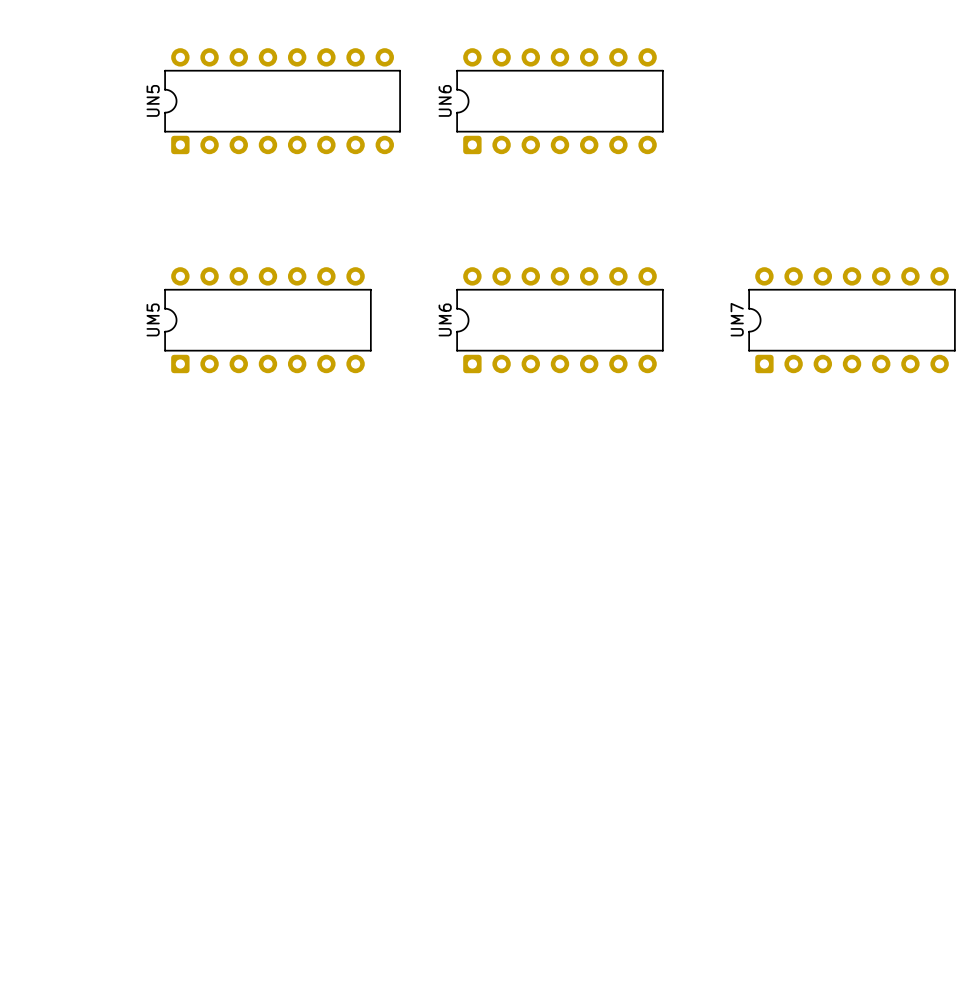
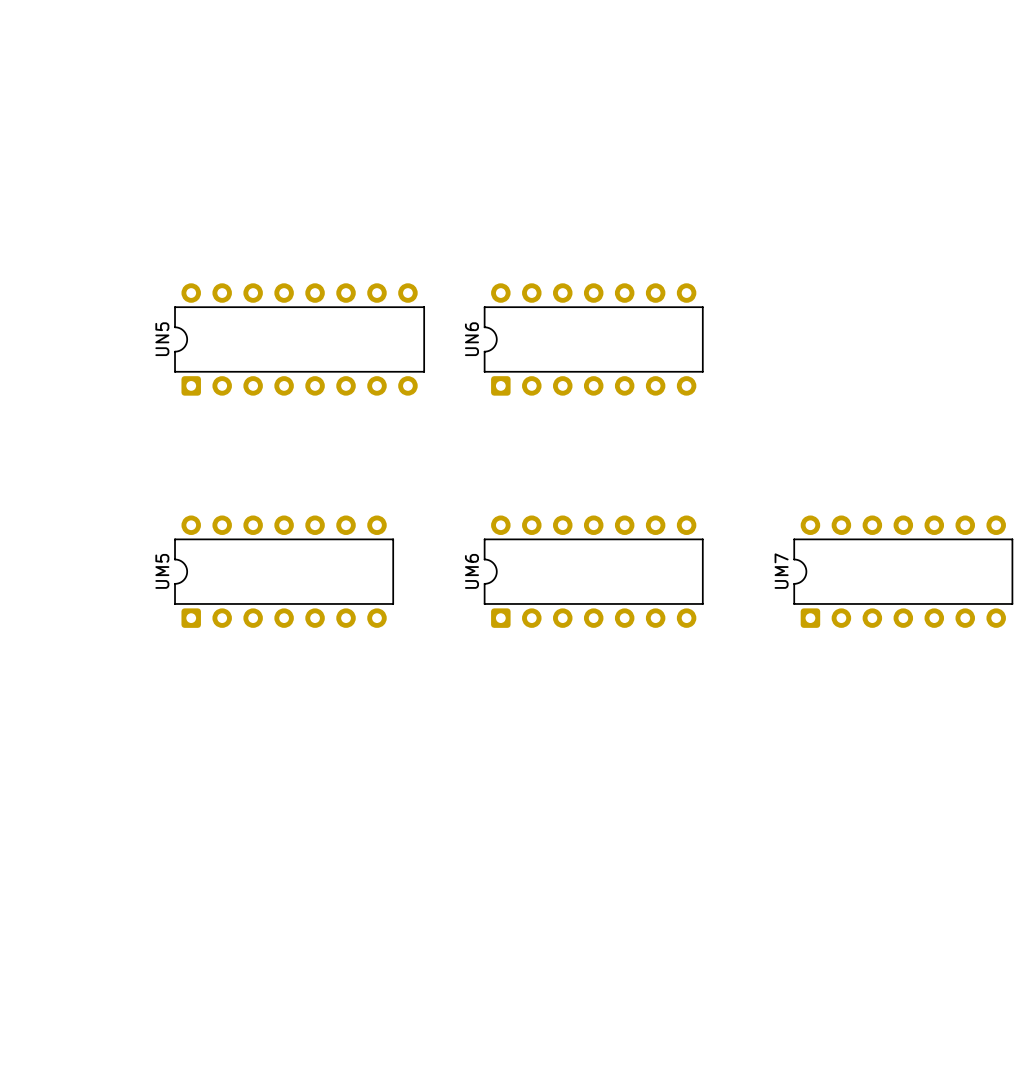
UN5 position: (282, 101) -> (299, 339)
UN6: (559, 101) -> none
UM6 name: UM6 (445, 319) -> UN6 (471, 339)
UM5 position: (267, 320) -> (284, 571)
UM7 position: (852, 320) -> (903, 571)
UM6: none -> (593, 571)

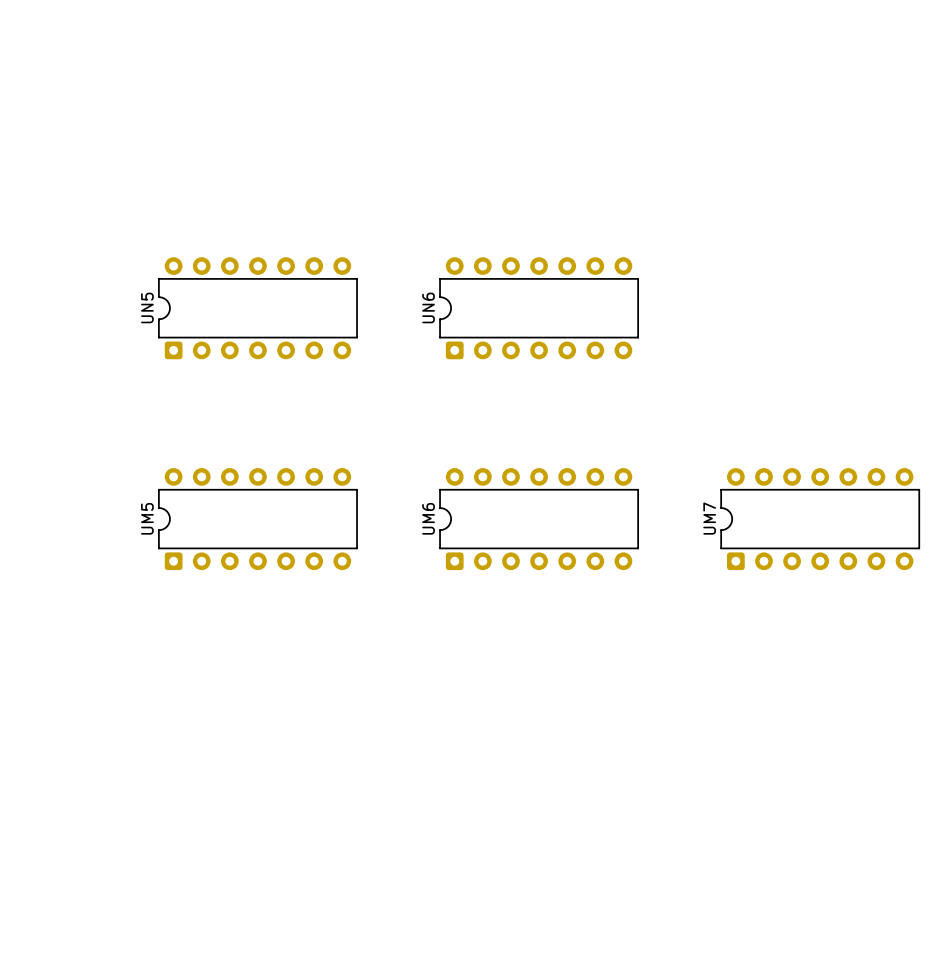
UN5 footprint: [174, 283, 425, 396] -> [158, 257, 358, 360]

